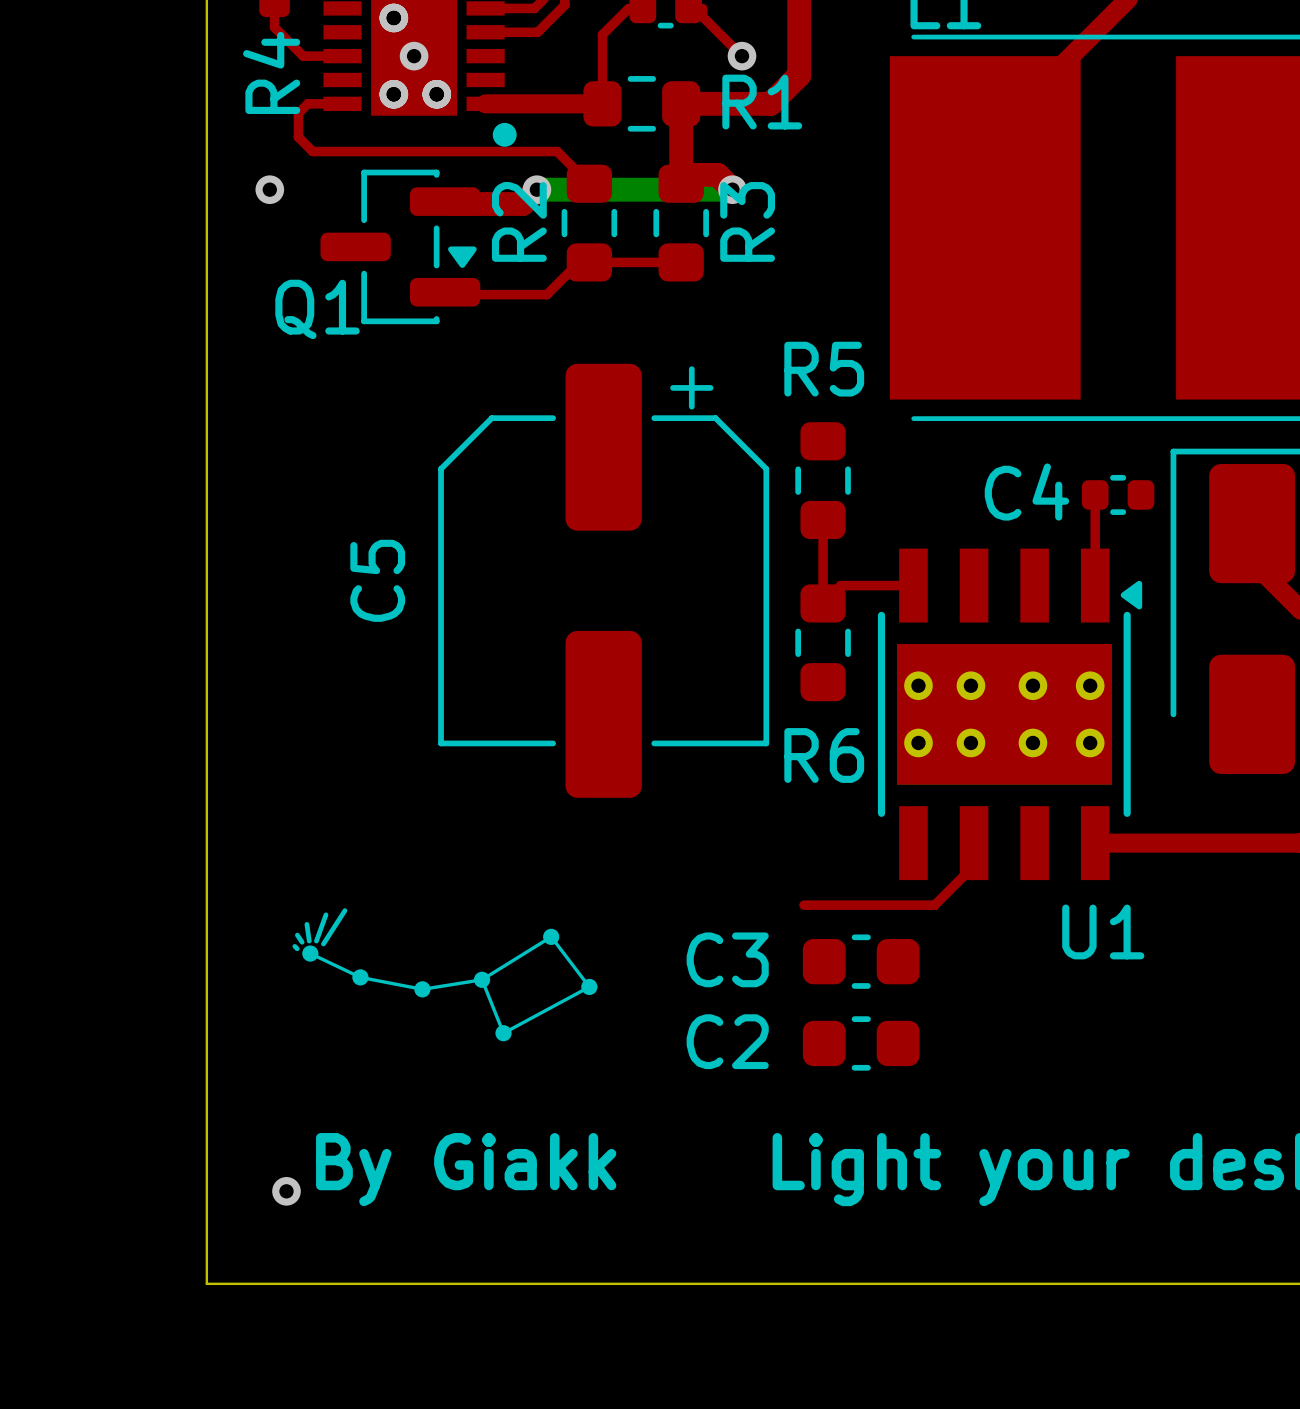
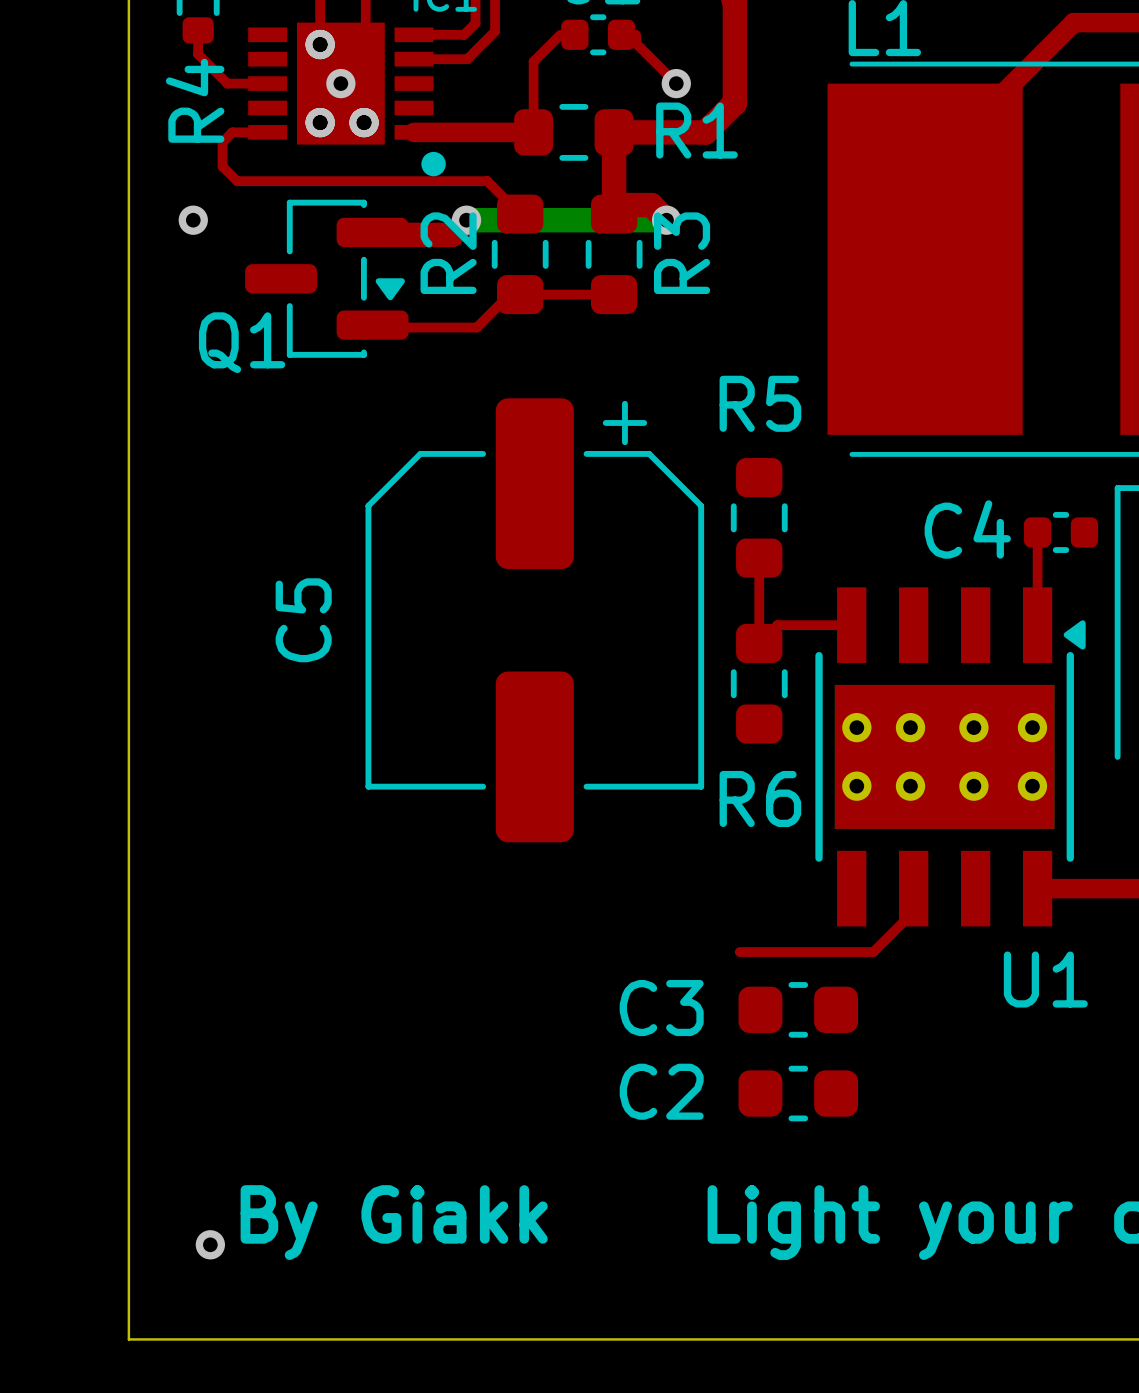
line: (344, 910) (323, 944) -> none
line: (325, 914) (316, 941) -> none
line: (306, 924) (309, 941) -> none
drawing: [543, 928, 598, 996] -> none
line: (297, 935) (302, 942) -> none
drawing: [302, 945, 512, 1042] -> none
line: (294, 946) (297, 948) -> none
line: (310, 953) (360, 977) (422, 989) (482, 979) -> none
line: (482, 979) (503, 1033) (589, 986) (551, 936) (482, 979) -> none

